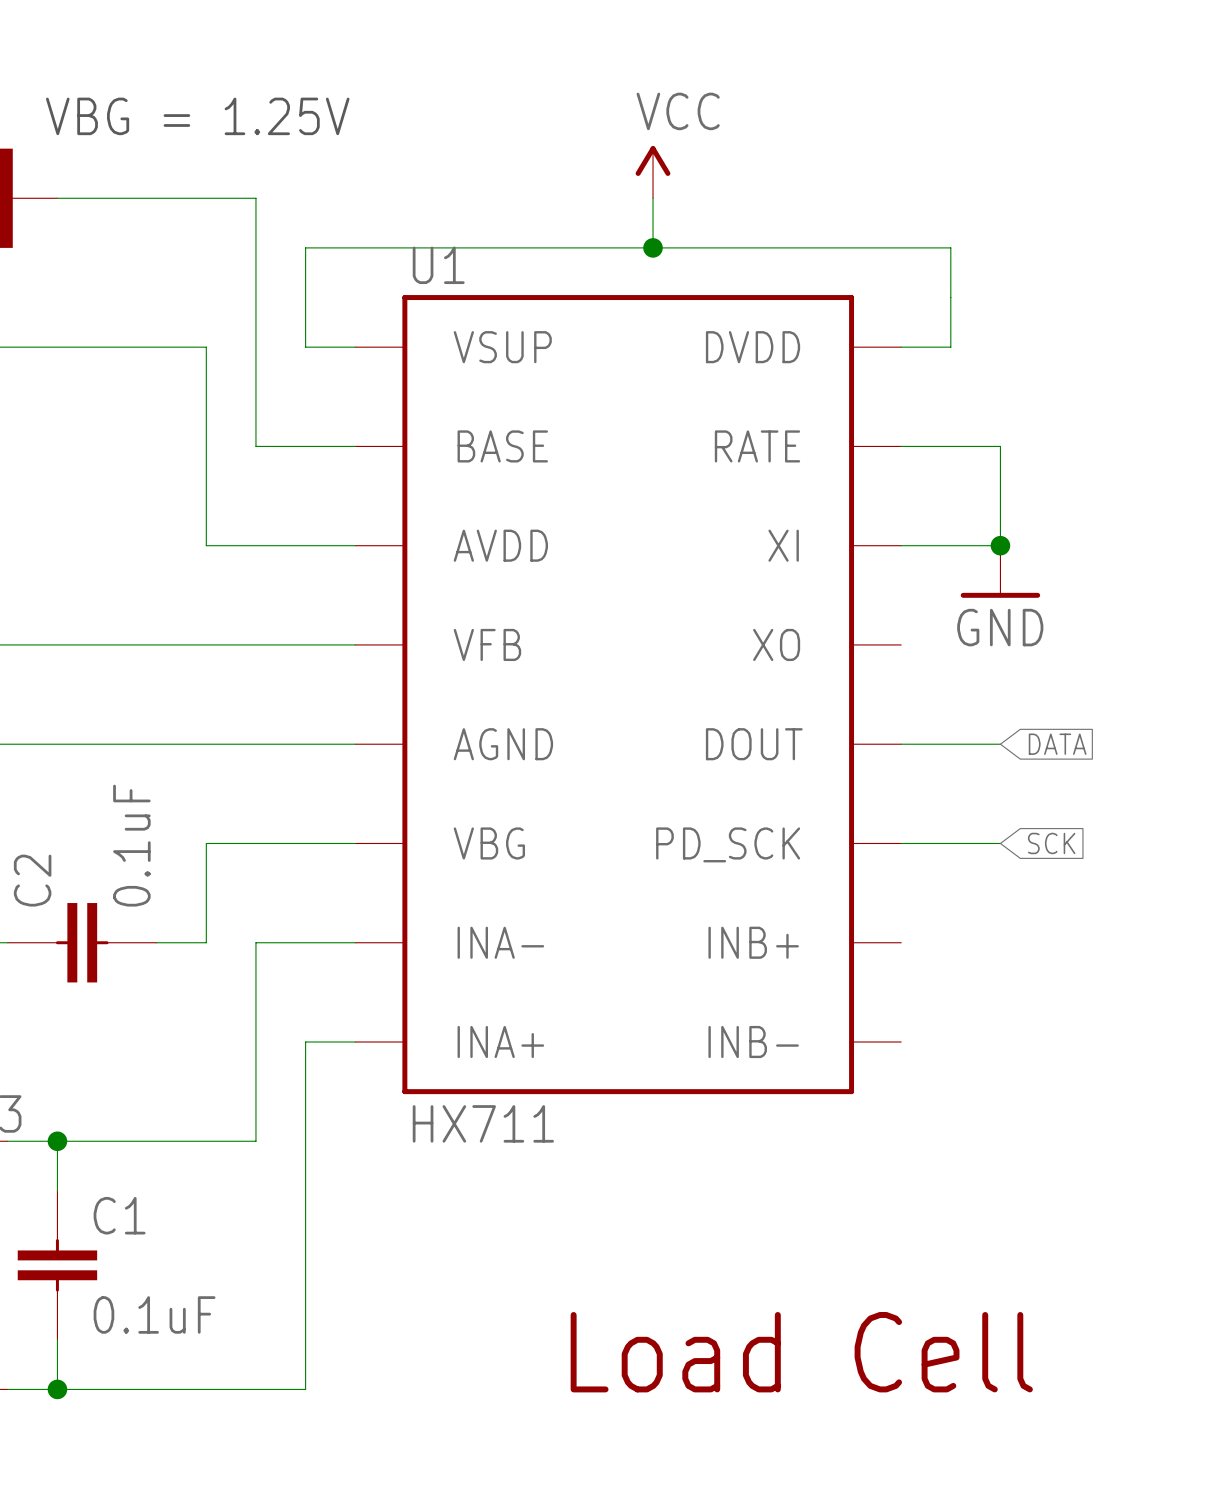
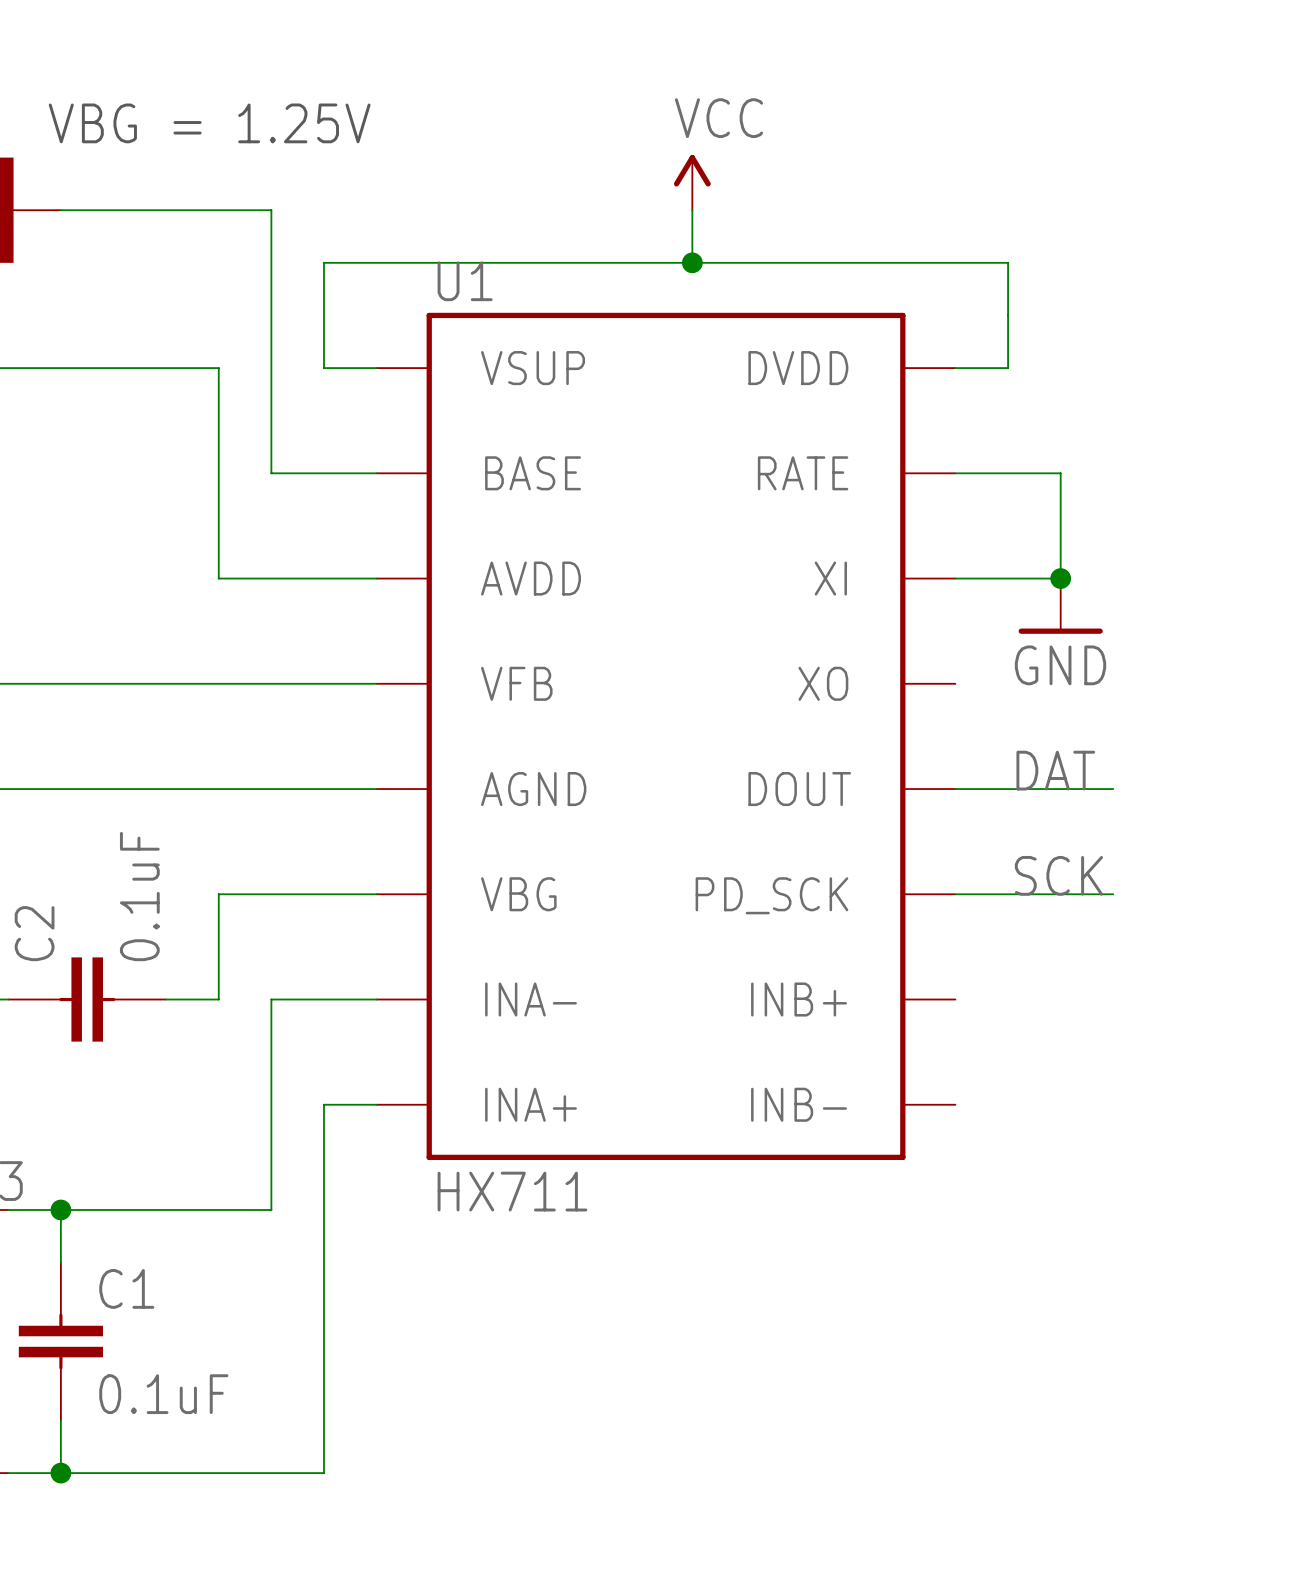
label: none -> DAT (1055, 770)
wire: none -> (1060, 789) (1113, 789)
global label: DATA (1057, 744) -> none
label: none -> SCK (1058, 875)
wire: none -> (1060, 894) (1113, 894)
global label: SCK (1051, 843) -> none
text: Load Cell (801, 1352) -> none

